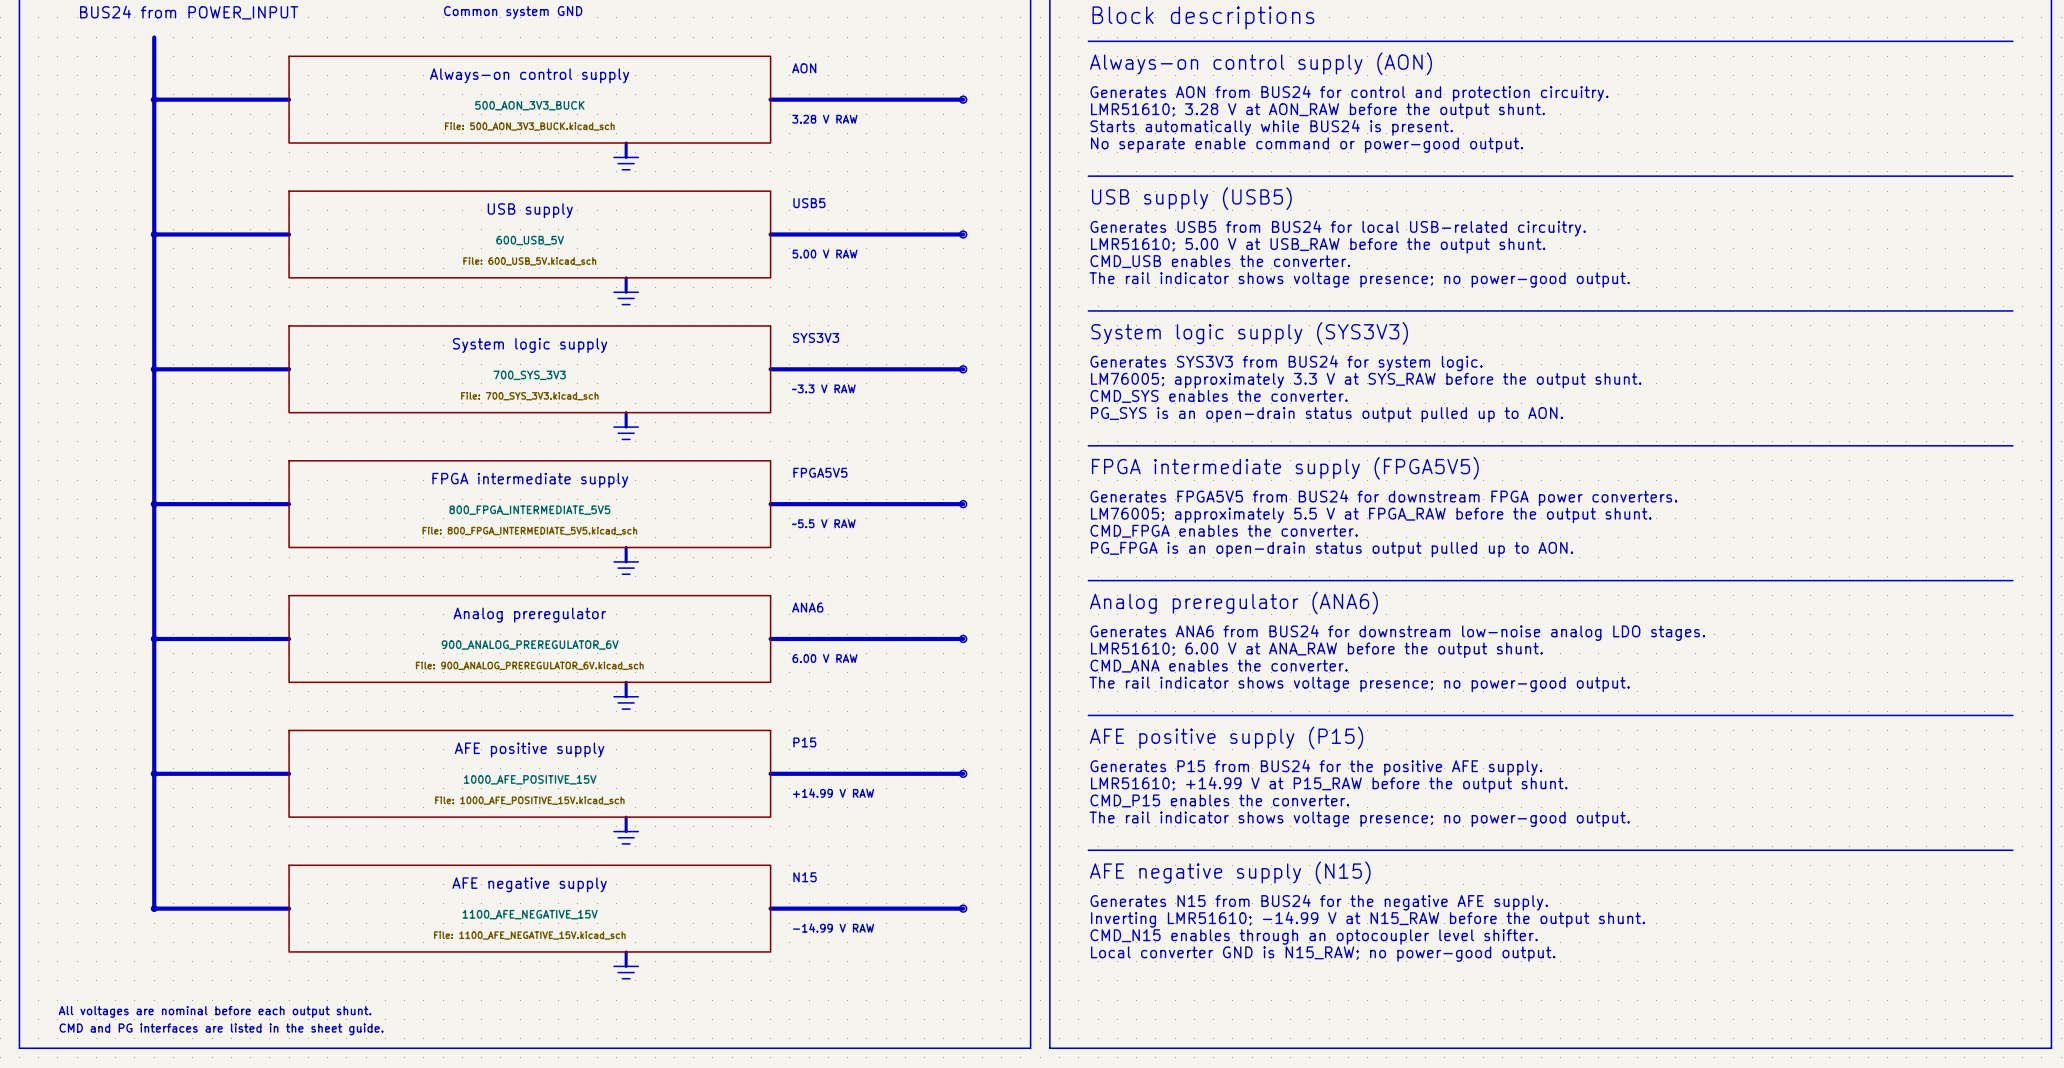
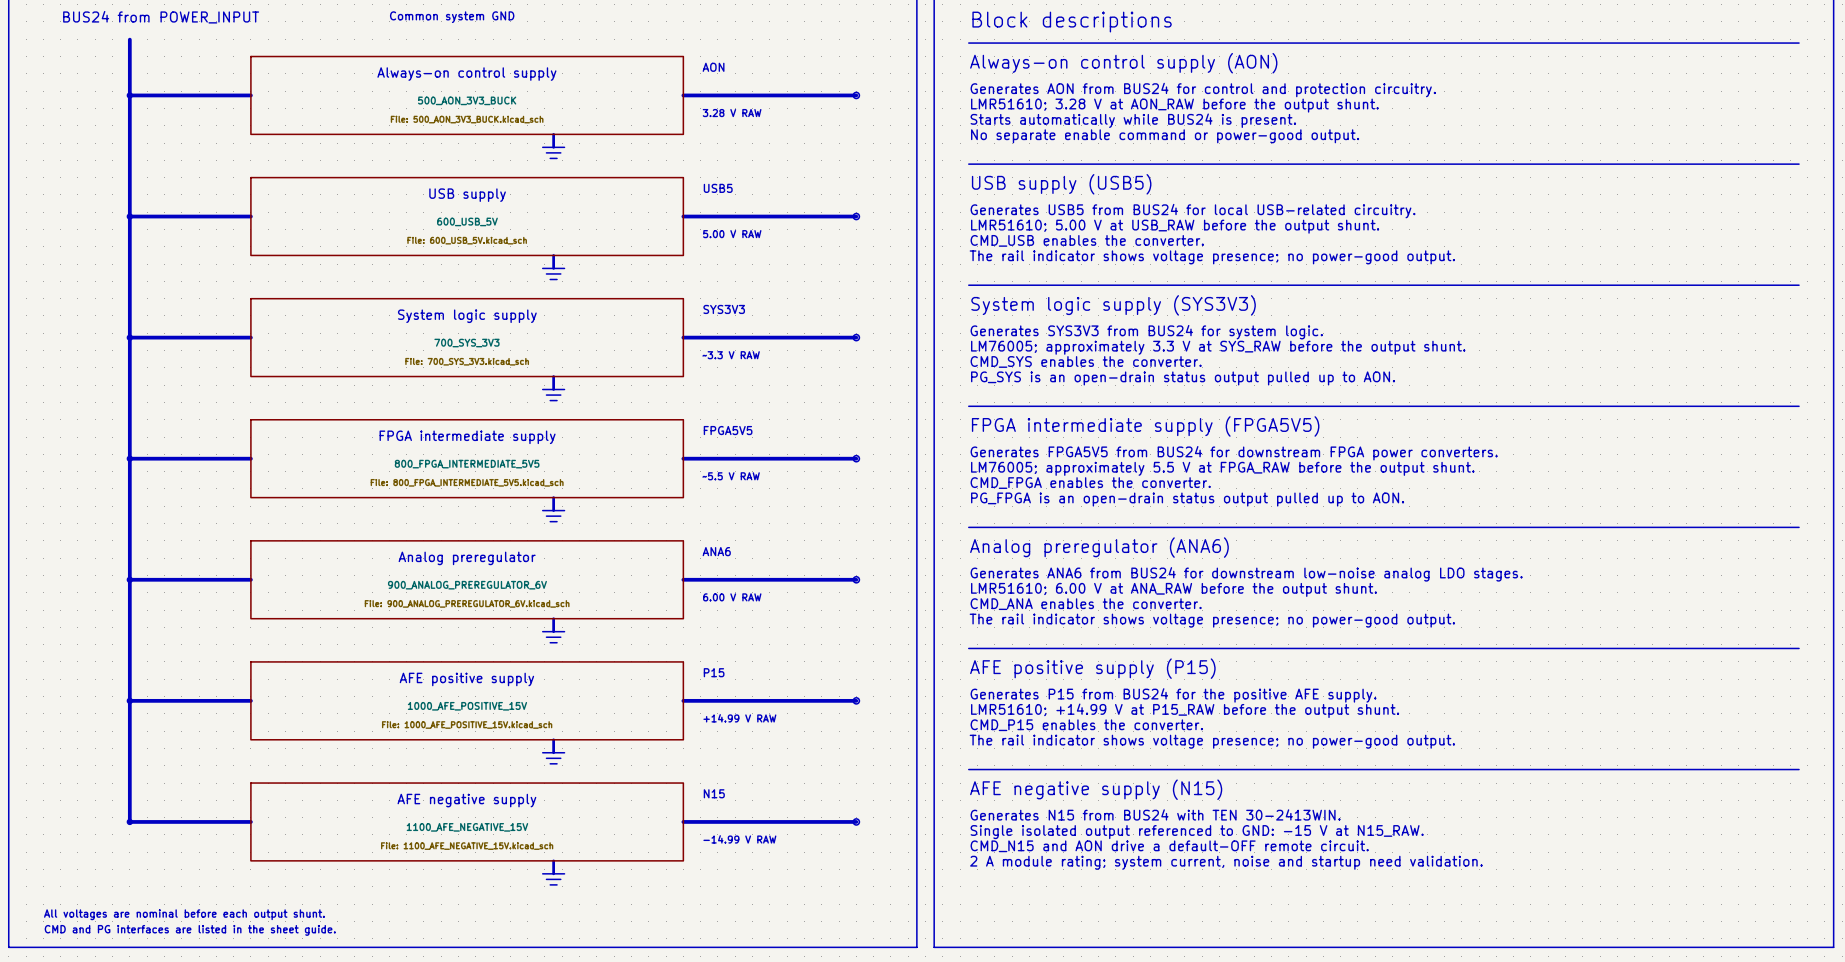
text: Generates N15 from BUS24 for the negative AFE supply. (1319, 902) -> Generates N15 from BUS24 with TEN 30-2413WIN. (1155, 814)
text: Inverting LMR51610; -14.99 V at N15_RAW before the output shunt. (1367, 919) -> Single isolated output referenced to GND: -15 V at N15_RAW. (1197, 832)
text: CMD_N15 enables through an optocoupler level shifter. (1314, 937) -> CMD_N15 and AON drive a default-OFF remote circuit. (1169, 846)
text: Local converter GND is N15_RAW; no power-good output. (1323, 954) -> 2 A module rating; system current, noise and startup need validation. (1226, 862)

